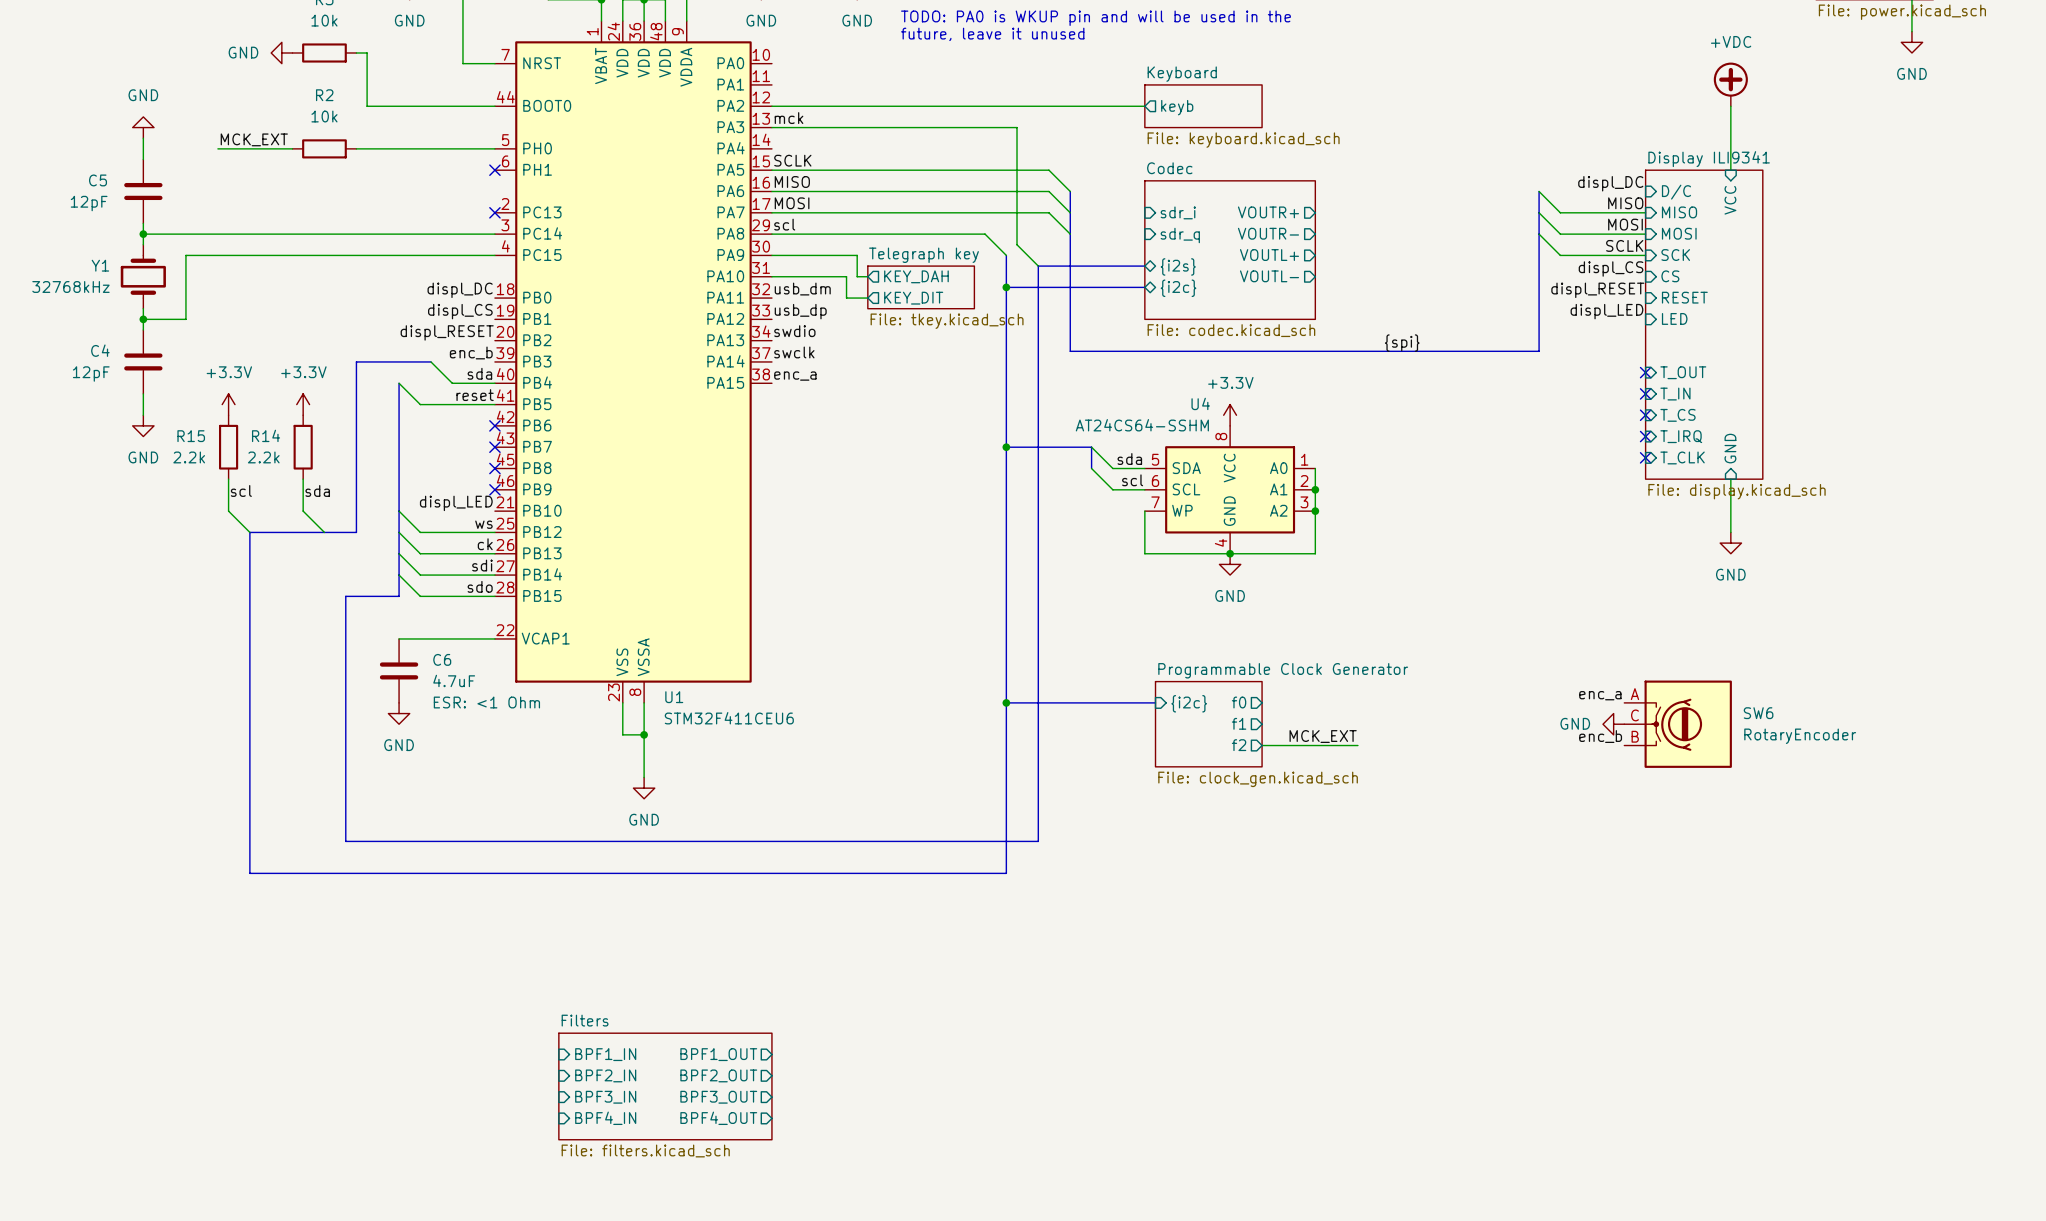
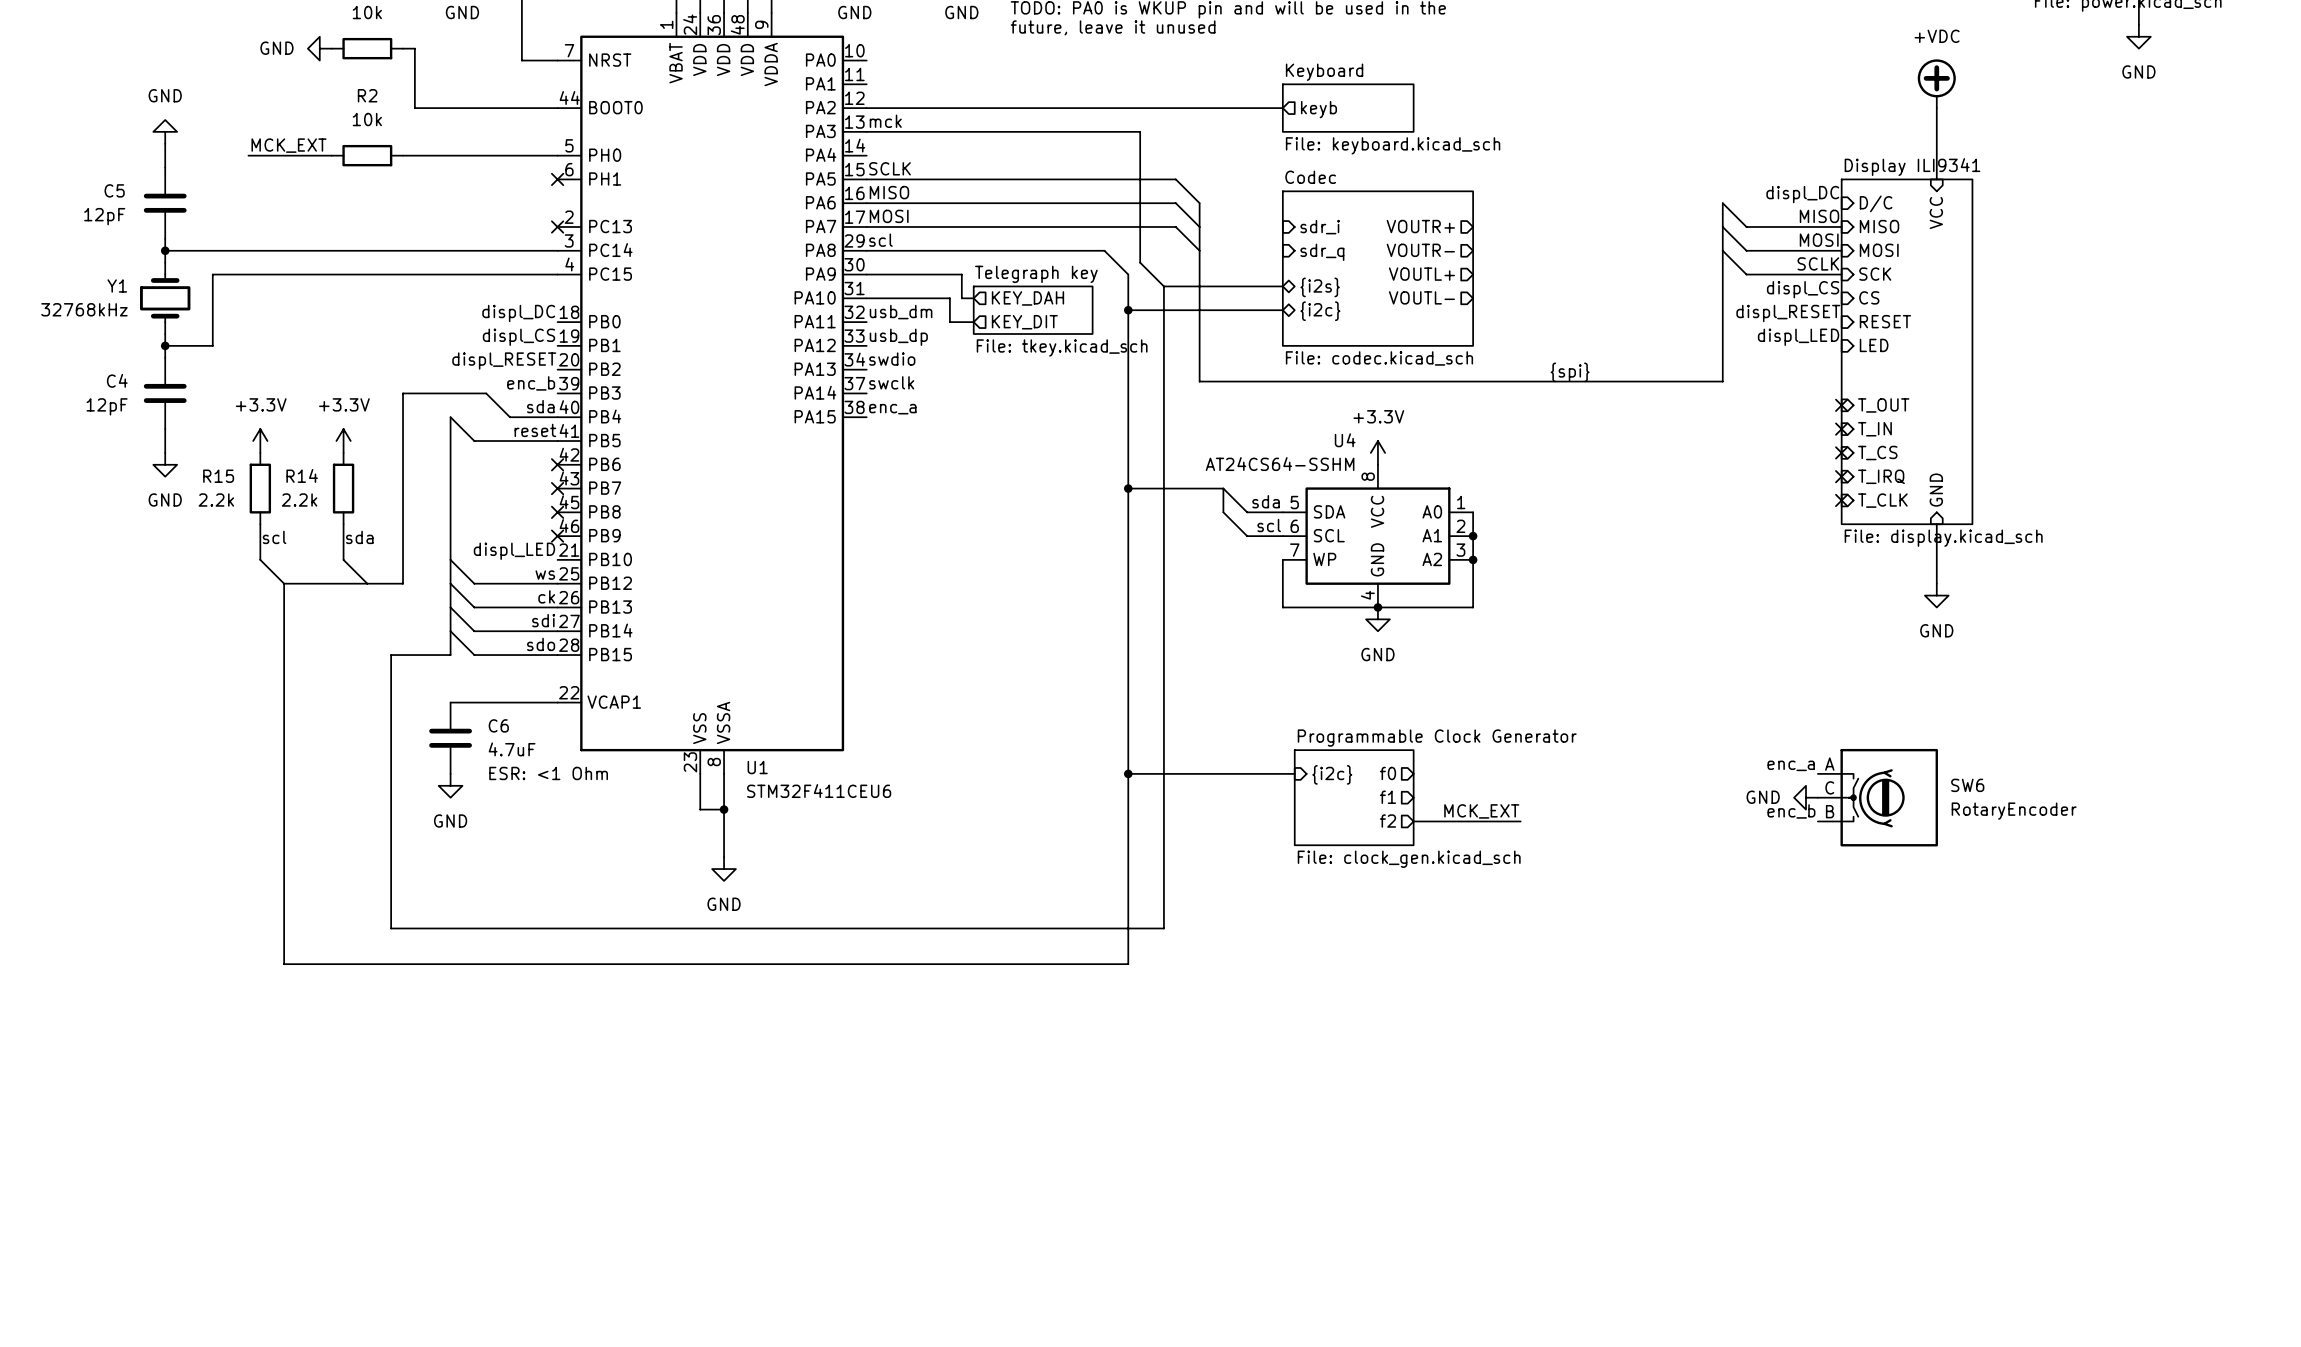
sheet pin: BPF1_IN (605, 1054) -> none
sheet pin: BPF1_OUT (718, 1054) -> none
sheet pin: BPF2_IN (605, 1075) -> none
sheet pin: BPF2_OUT (718, 1075) -> none
sheet Filters: File: filters.kicad_sch (665, 1086) -> none
sheet pin: BPF3_IN (605, 1097) -> none
sheet pin: BPF3_OUT (718, 1097) -> none
sheet pin: BPF4_IN (605, 1118) -> none
sheet pin: BPF4_OUT (718, 1118) -> none

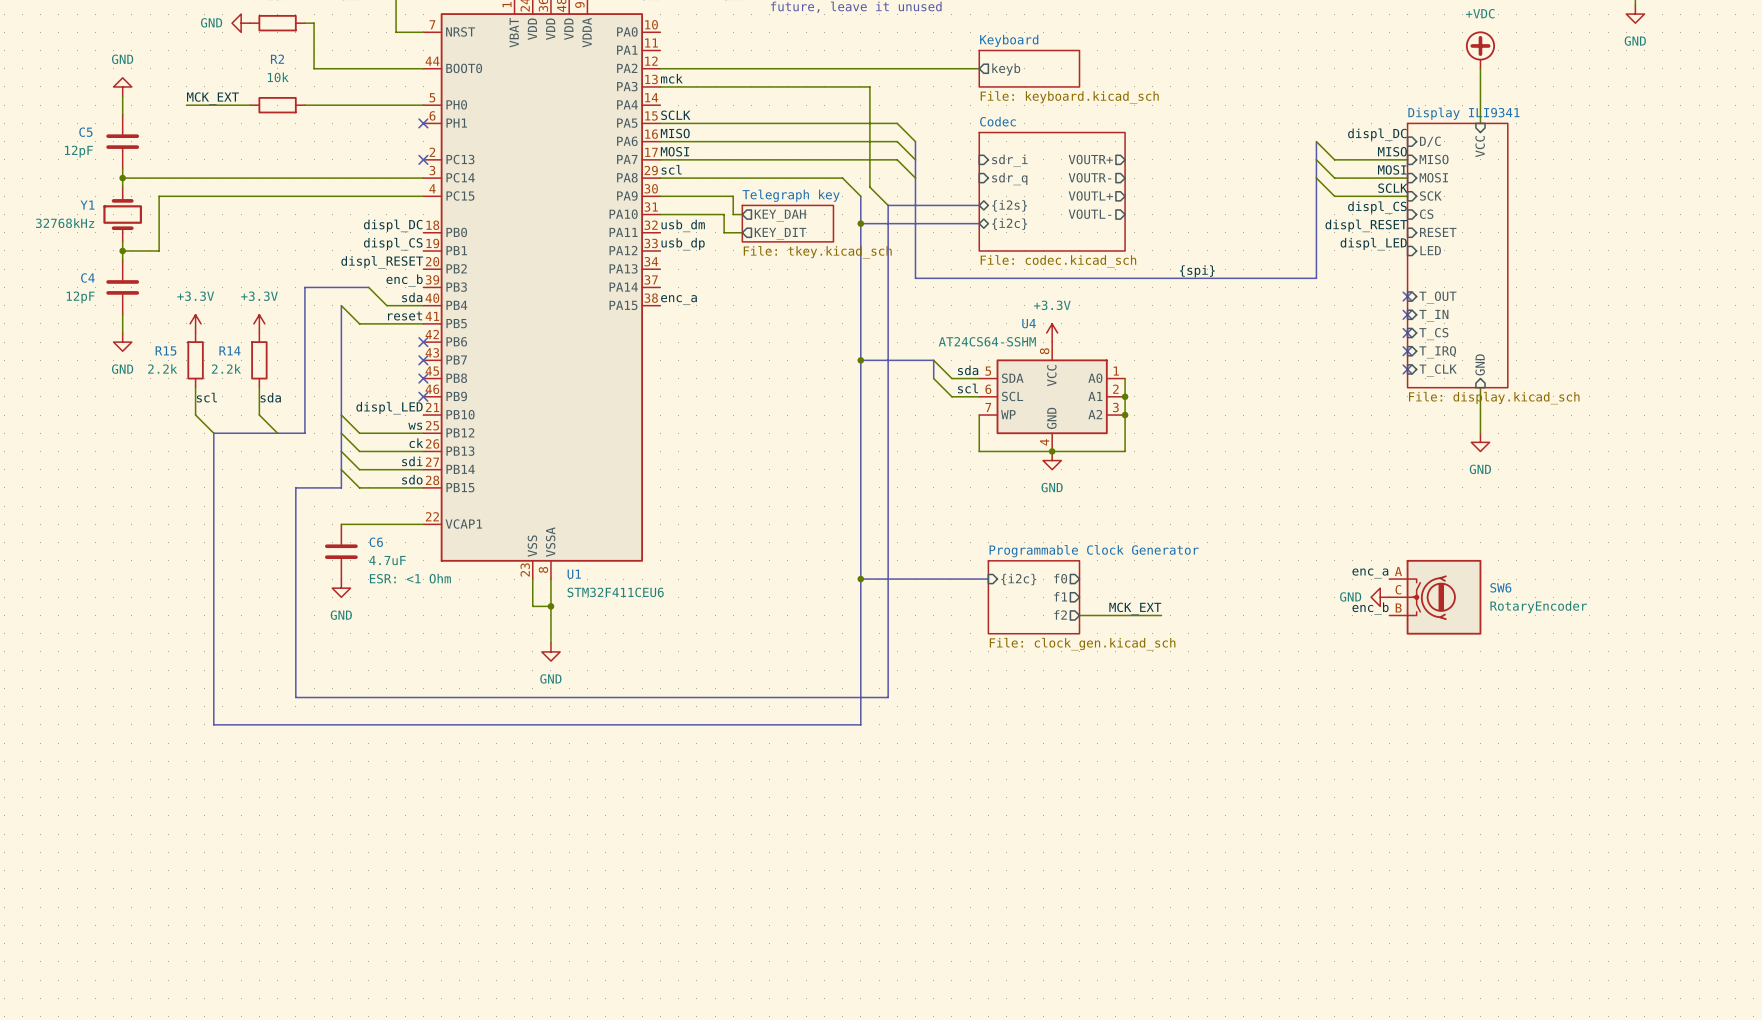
label: swdio (892, 359) -> none
label: swclk (891, 382) -> none

